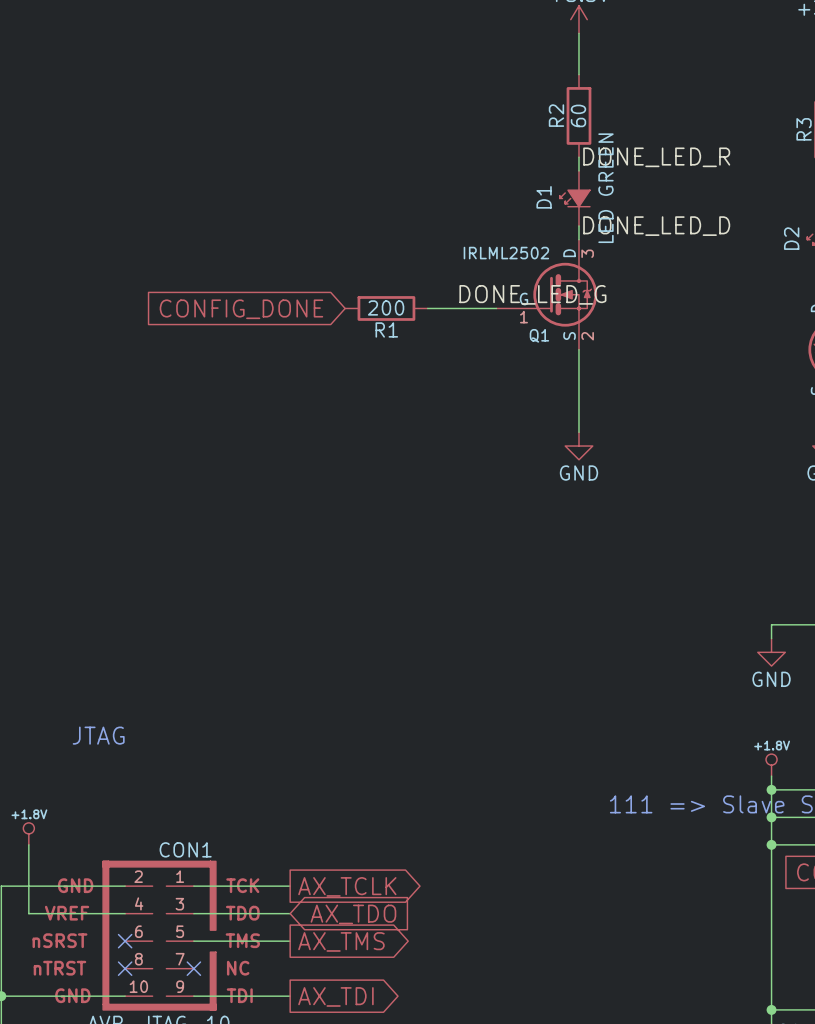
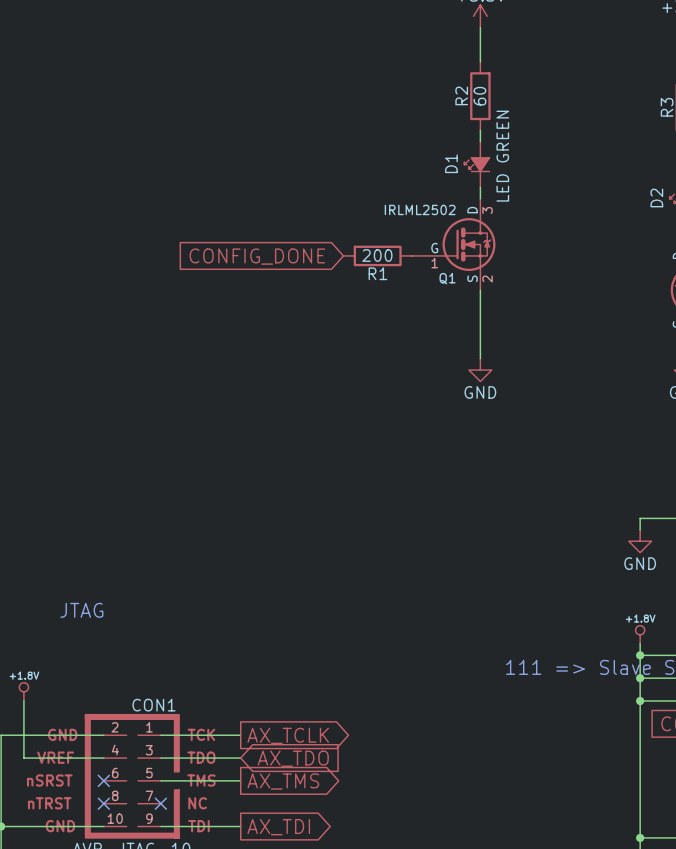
label: DONE_LED_R (656, 157) -> none
label: DONE_LED_D (656, 226) -> none
label: DONE_LED_G (532, 294) -> none
R1 position: (386, 308) -> (377, 255)
wire: (427, 308) (496, 308) -> none
global label position: CONFIG_DONE (241, 309) -> CONFIG_DONE (257, 256)

